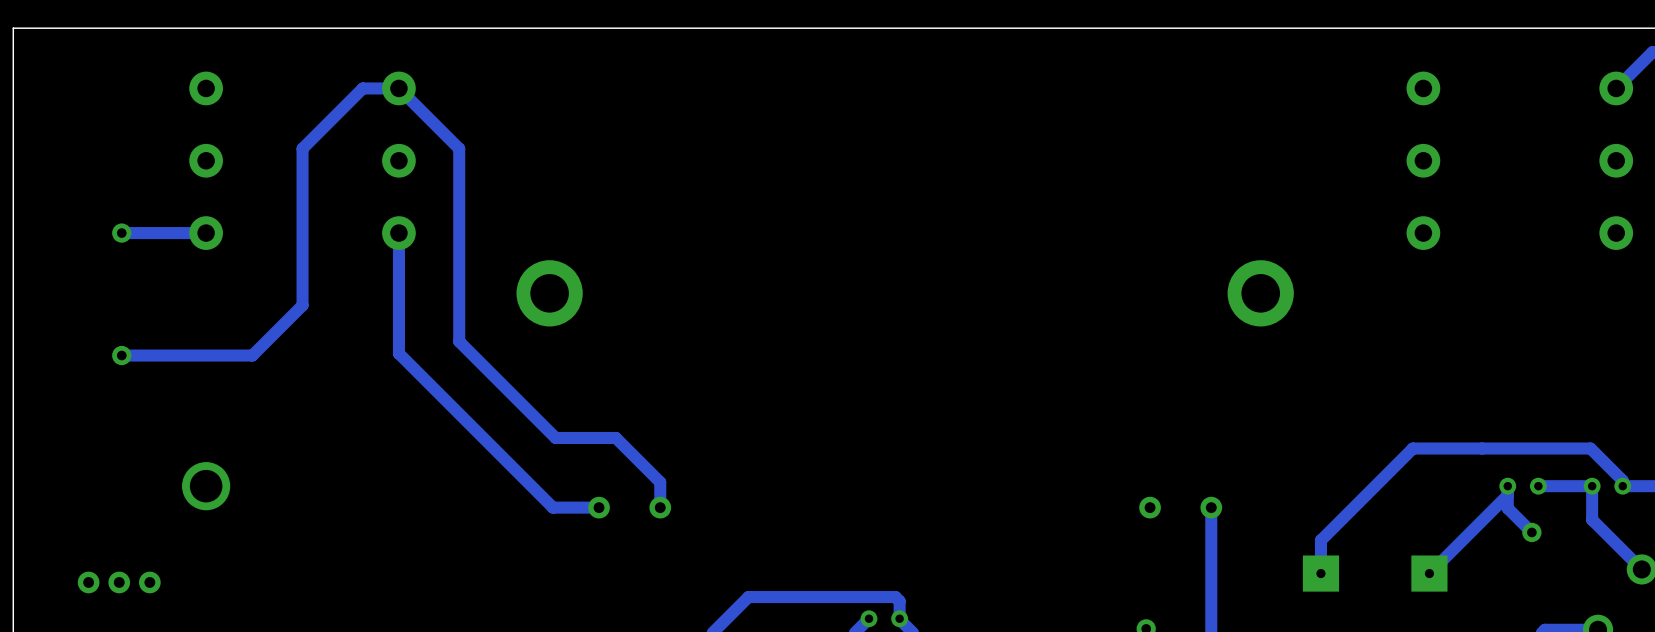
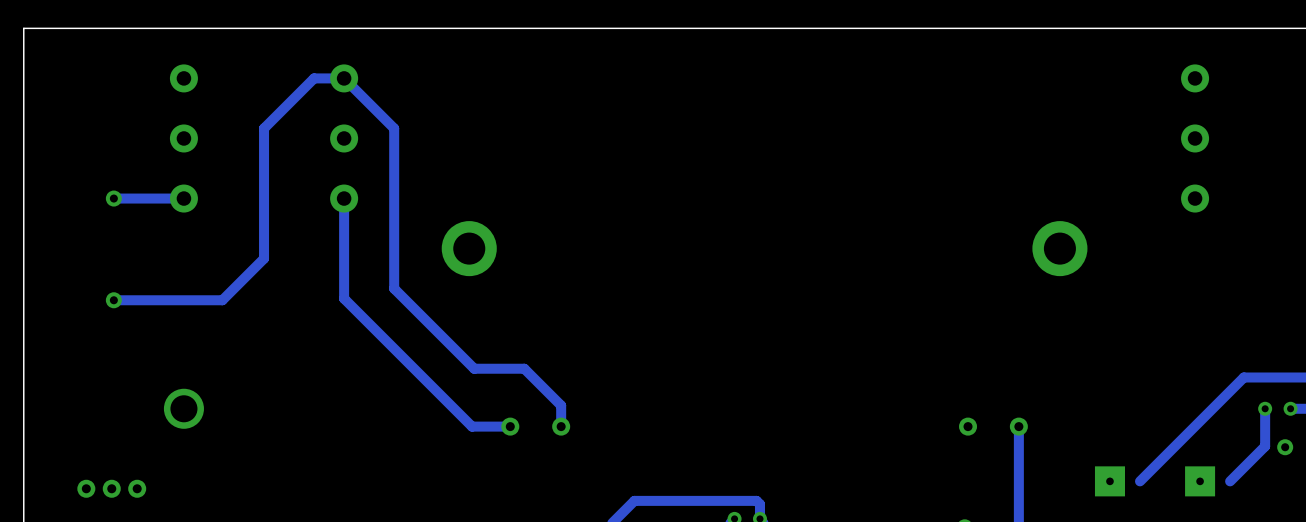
track: (1482, 448) (1412, 448) (1320, 540) (1320, 573) -> (1243, 377) (1140, 481)
track: (1507, 495) (1429, 573) -> none
track: (1507, 508) (1531, 532) -> (1265, 427) (1265, 446) (1230, 481)

